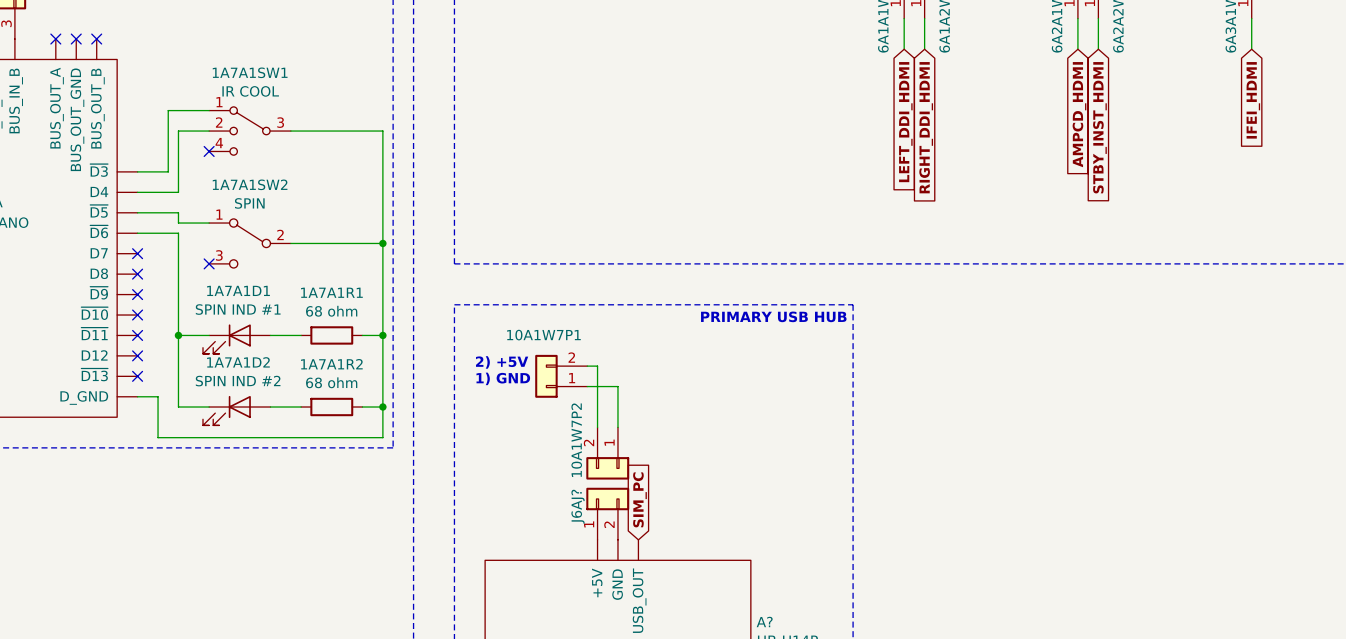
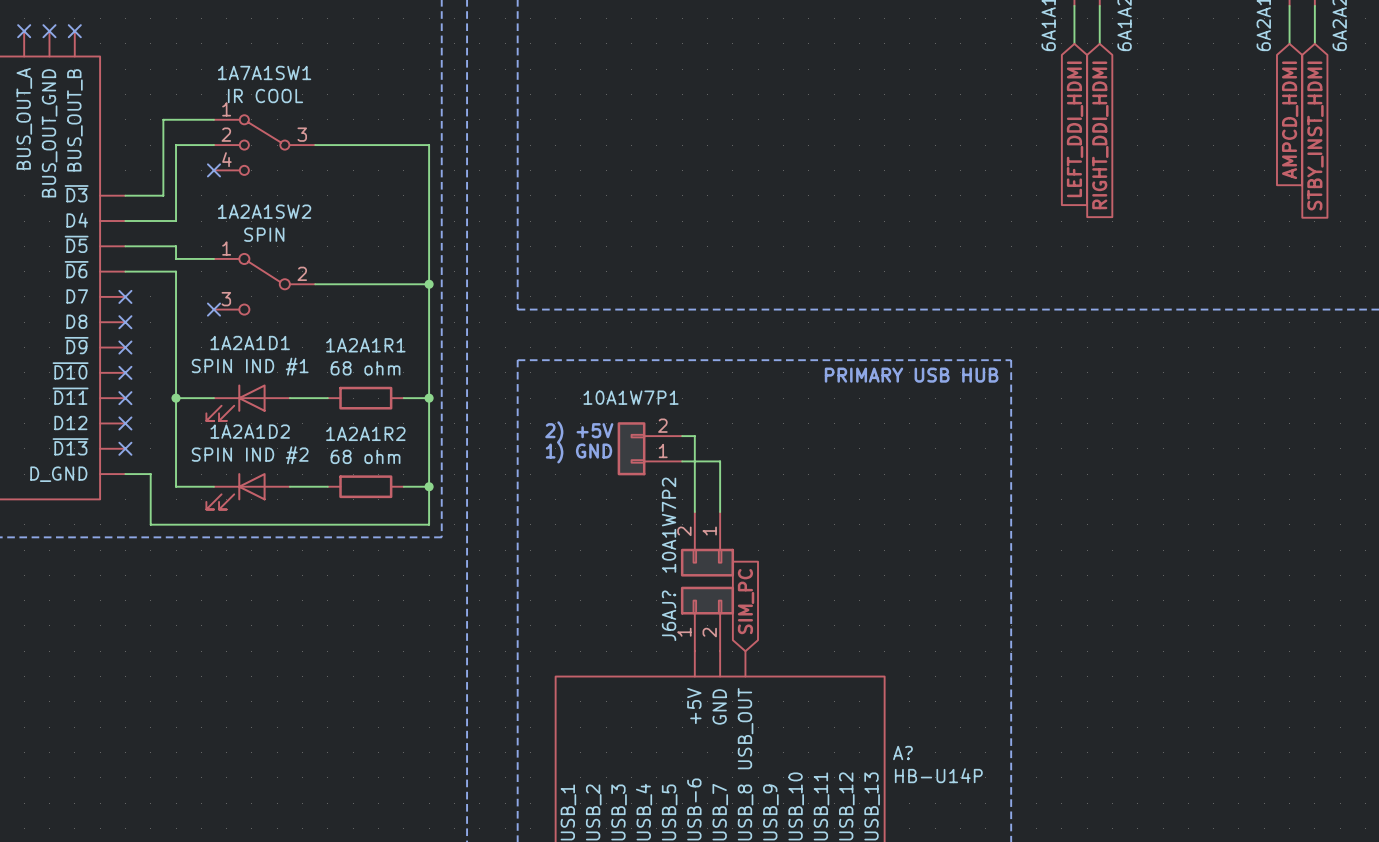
1A7A1SW2 name: 1A7A1SW2 (250, 184) -> 1A2A1SW2 (264, 211)
1A7A1D1 name: 1A7A1D1 (238, 290) -> 1A2A1D1 (250, 343)
1A7A1R1 name: 1A7A1R1 (331, 292) -> 1A2A1R1 (365, 345)
1A7A1D2 name: 1A7A1D2 (238, 362) -> 1A2A1D2 (250, 431)
1A7A1R2 name: 1A7A1R2 (331, 364) -> 1A2A1R2 (365, 433)

